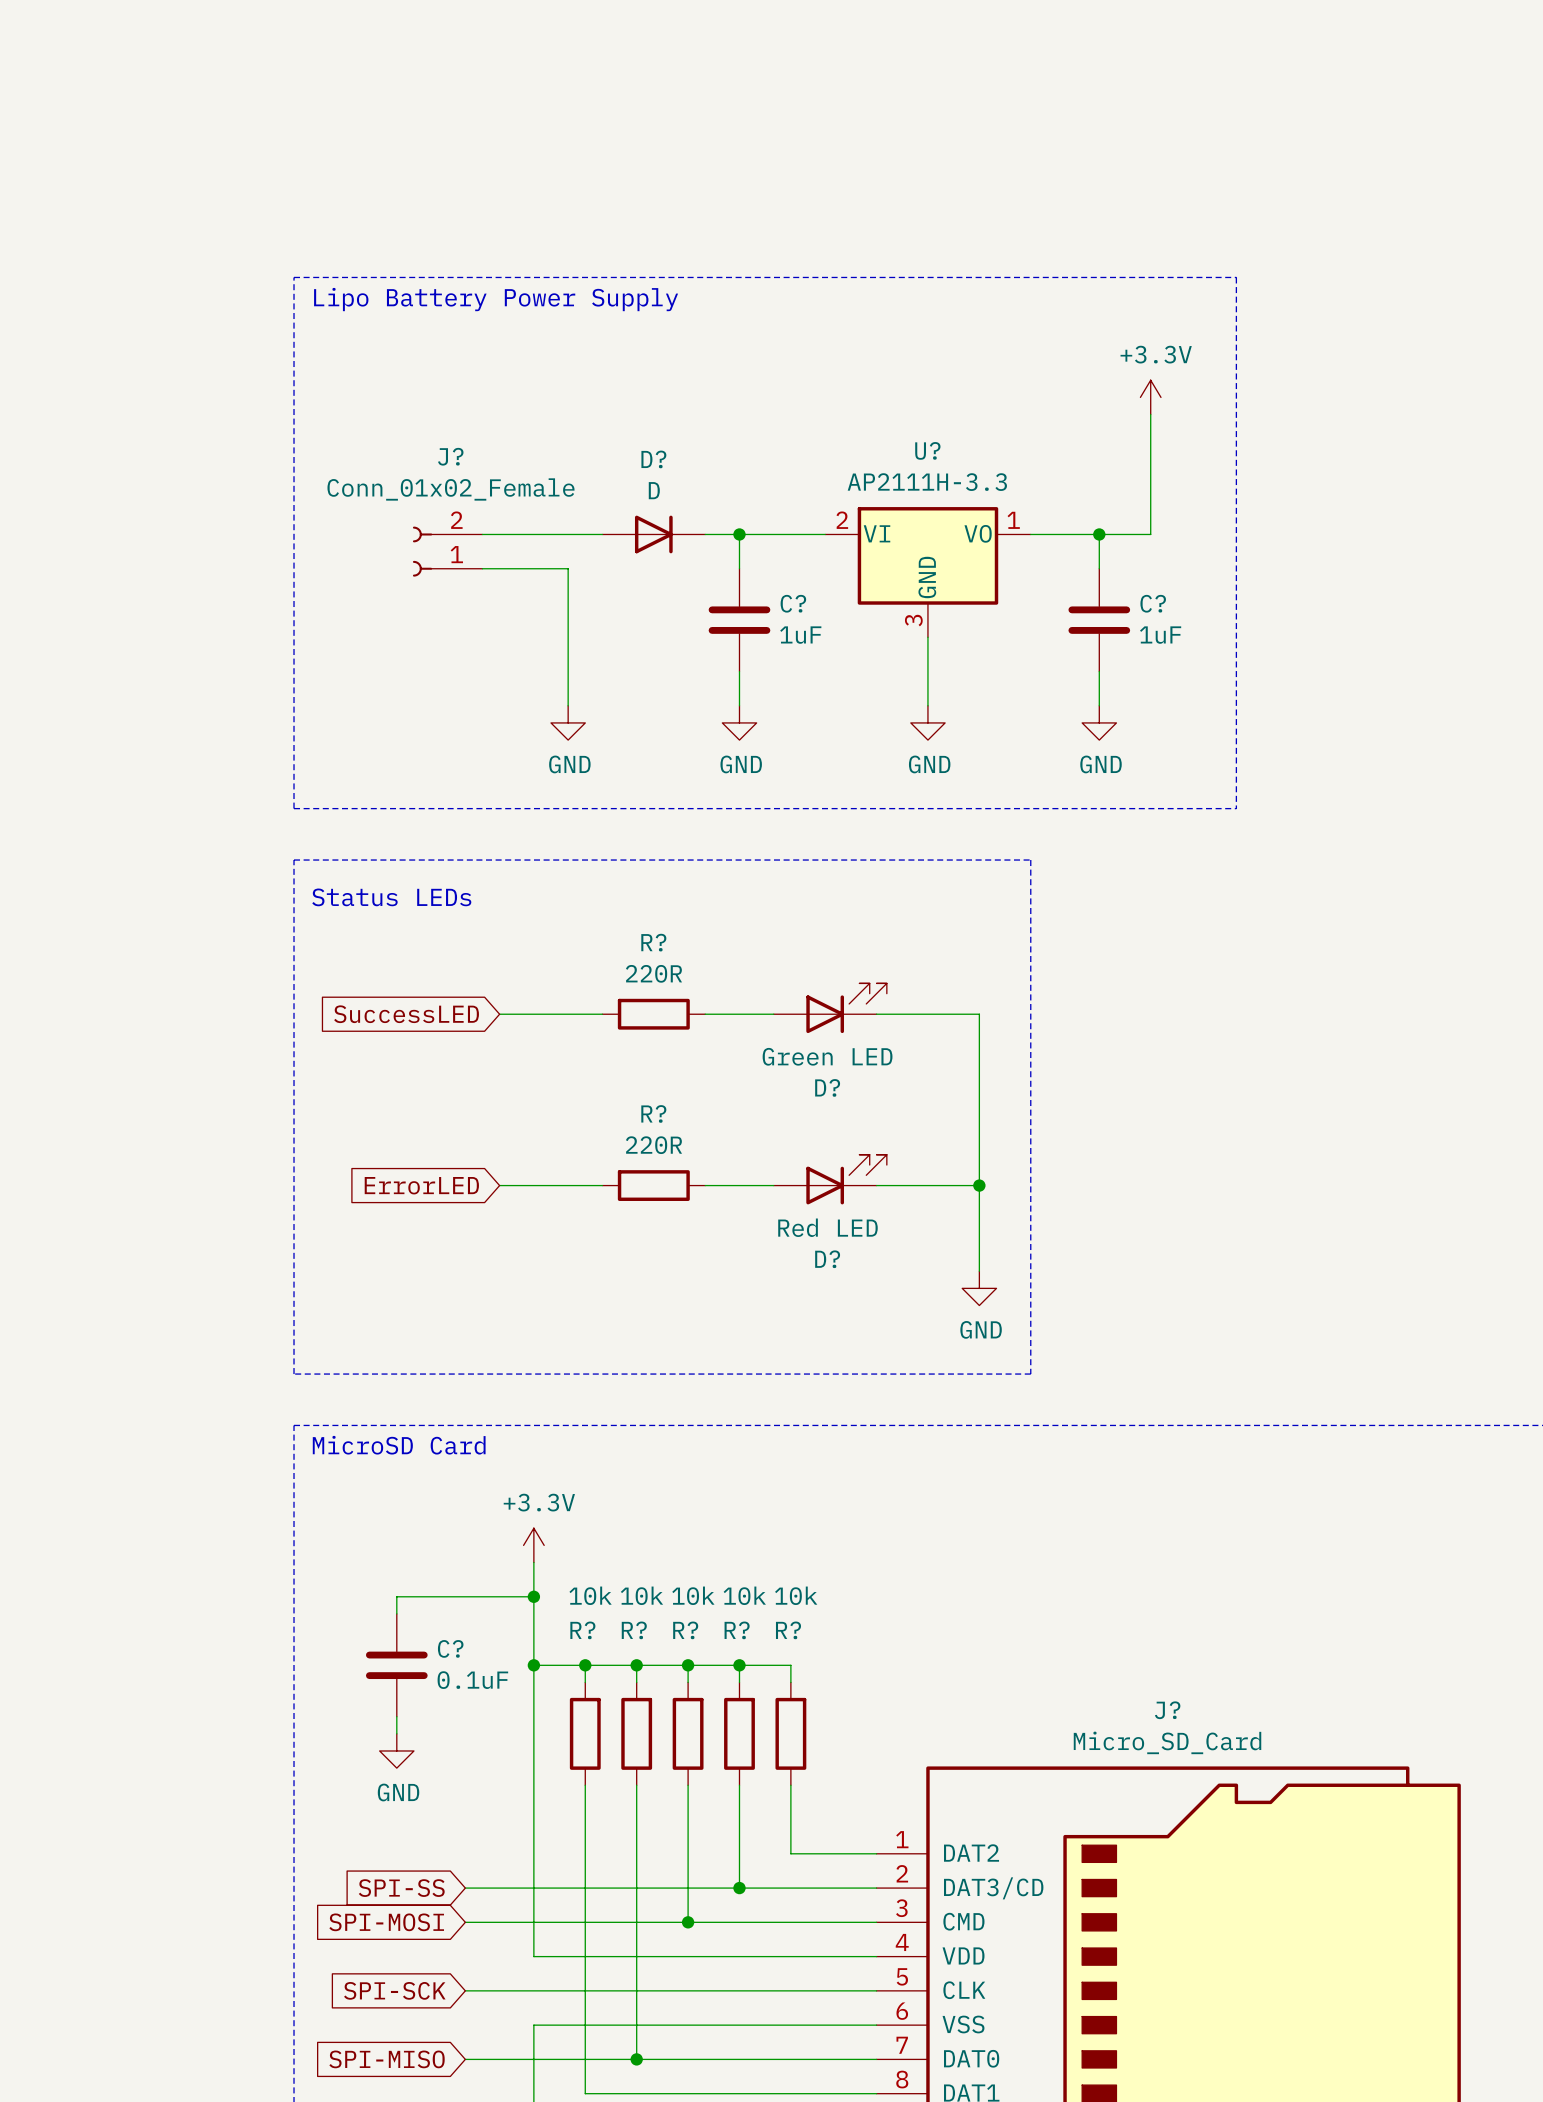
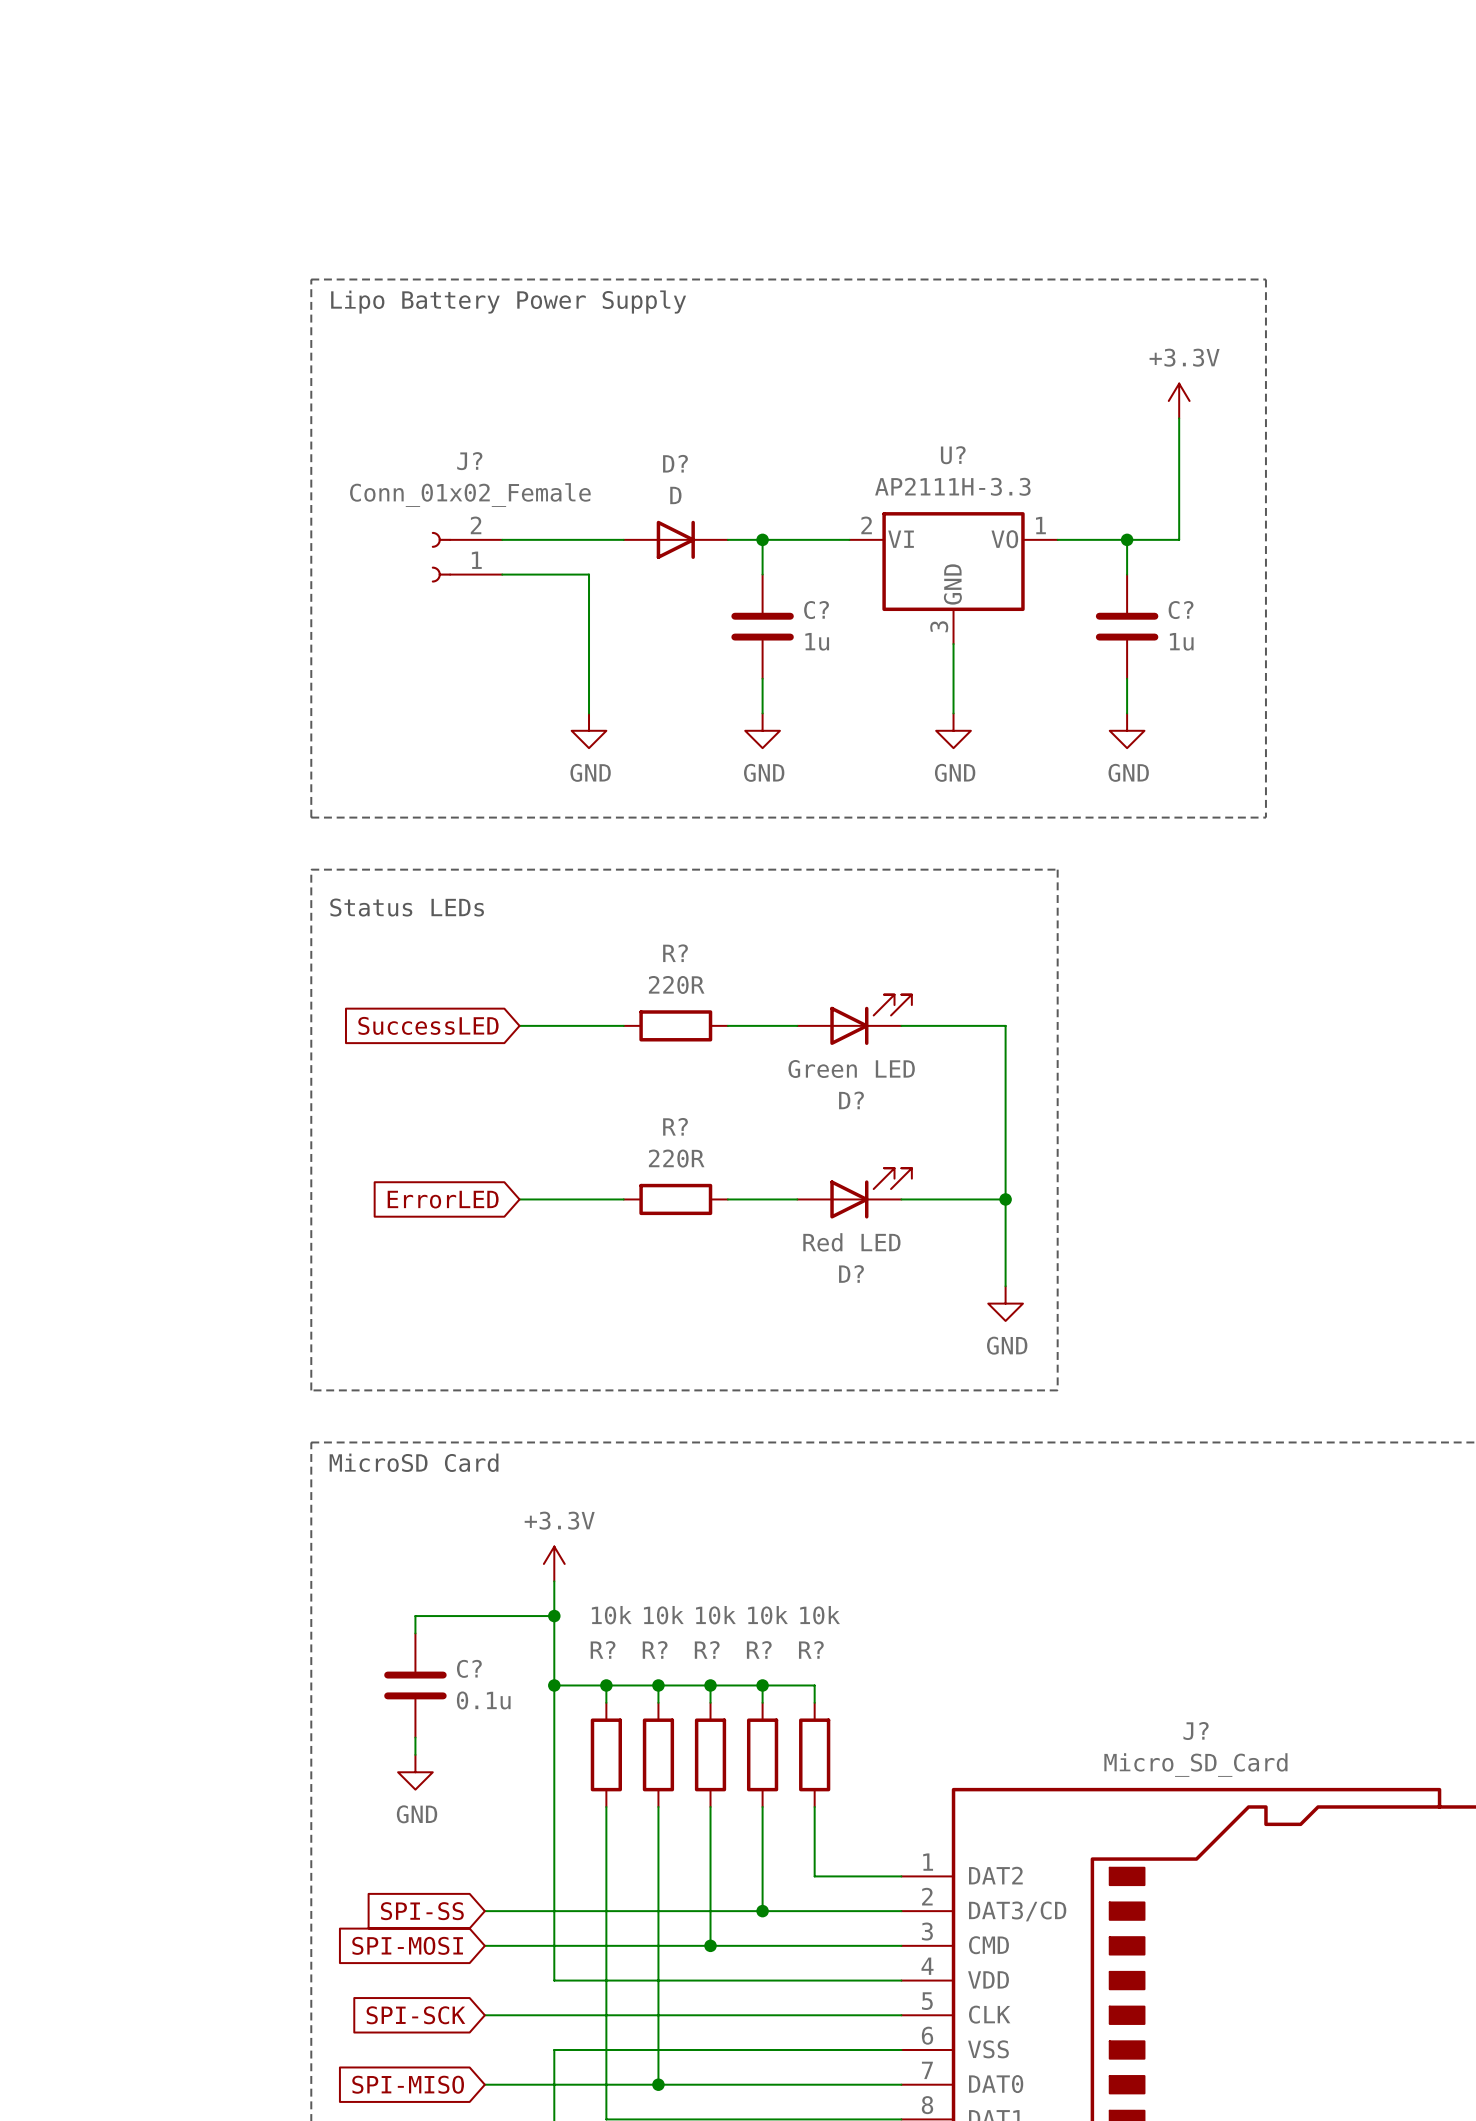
C? value: 1uF (800, 635) -> 1u (817, 641)
C? value: 1uF (1160, 635) -> 1u (1181, 641)
C? value: 0.1uF (472, 1680) -> 0.1u (483, 1700)

